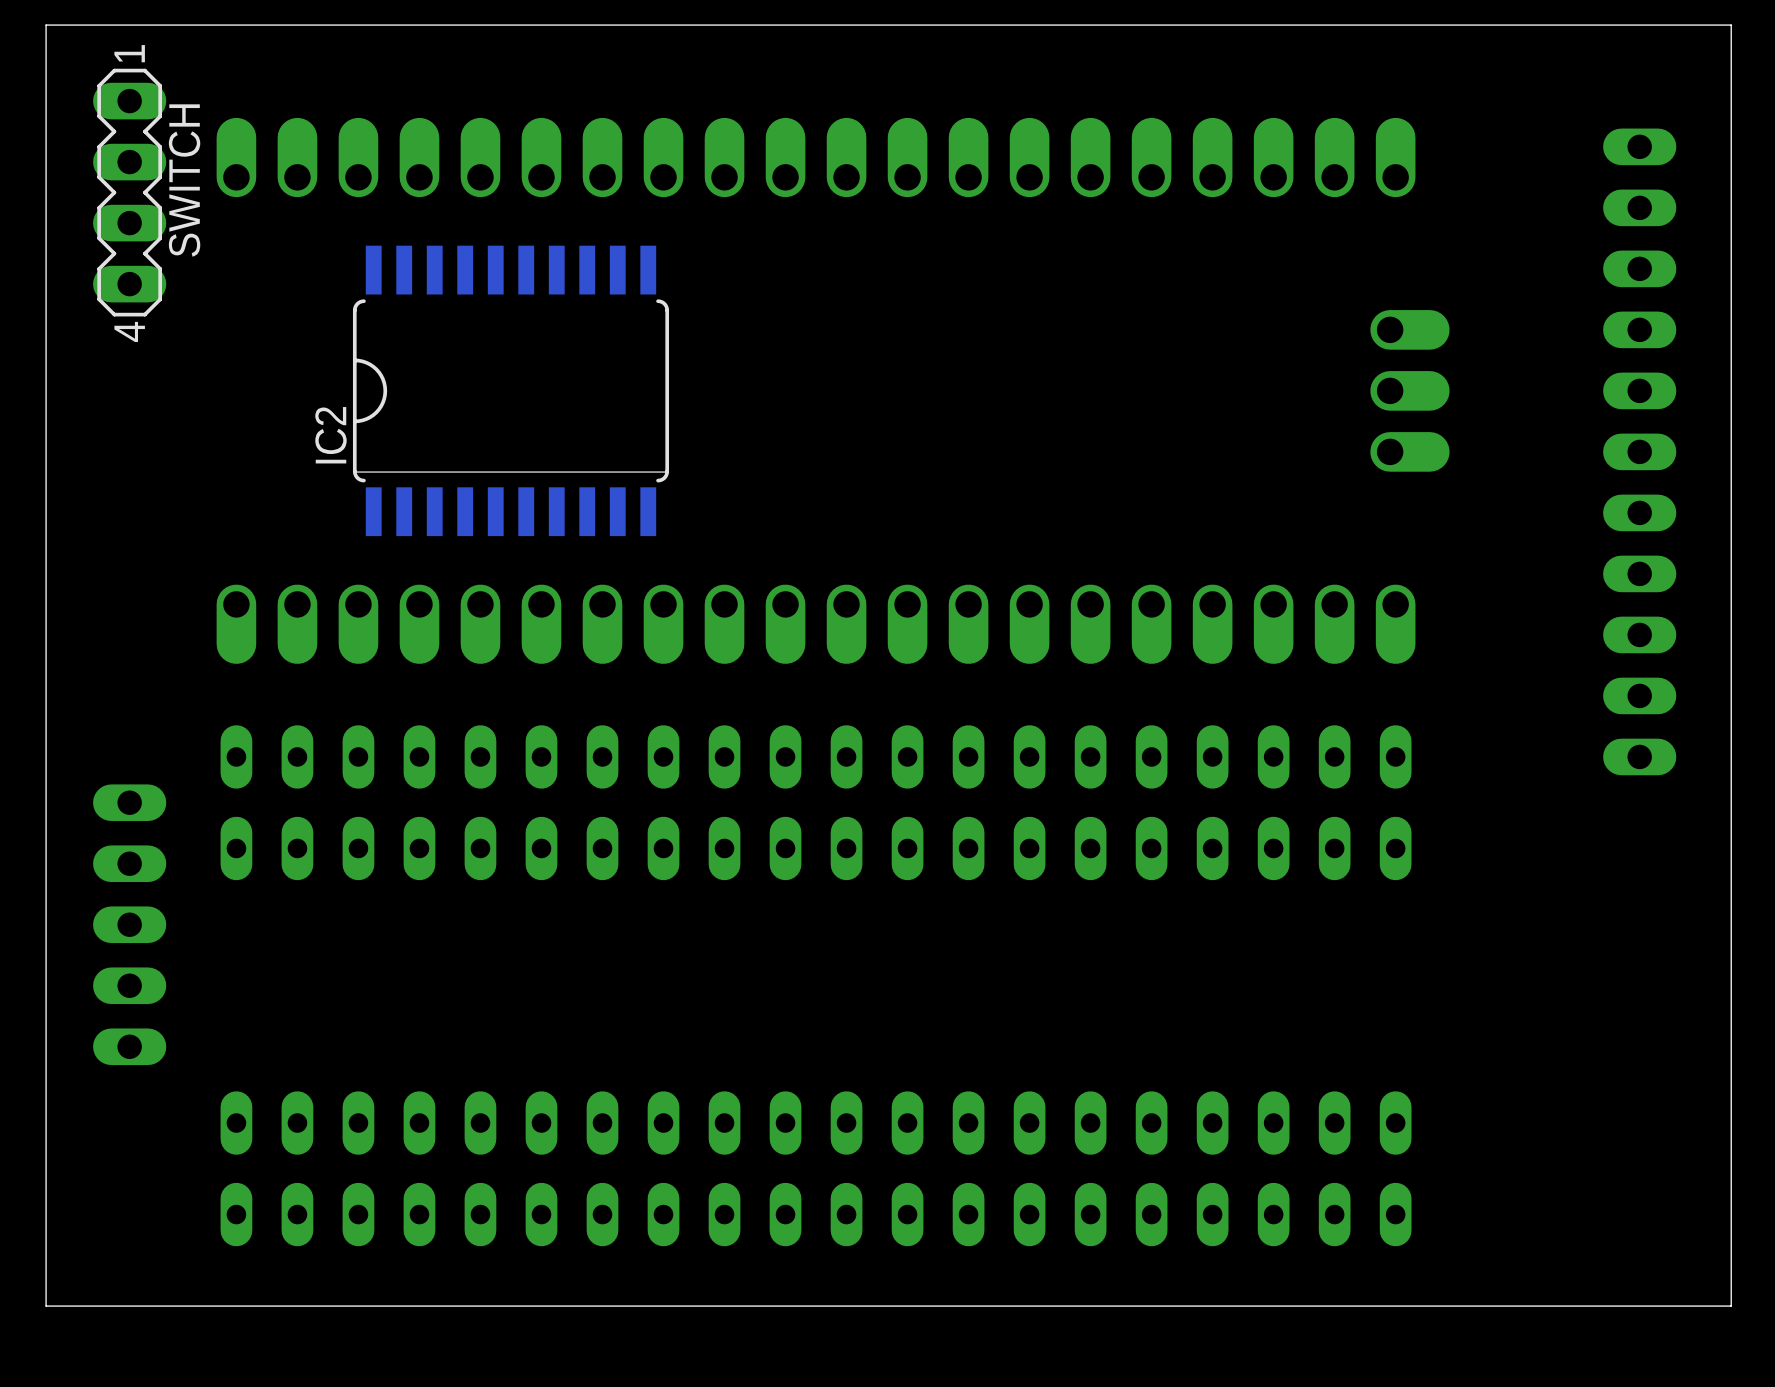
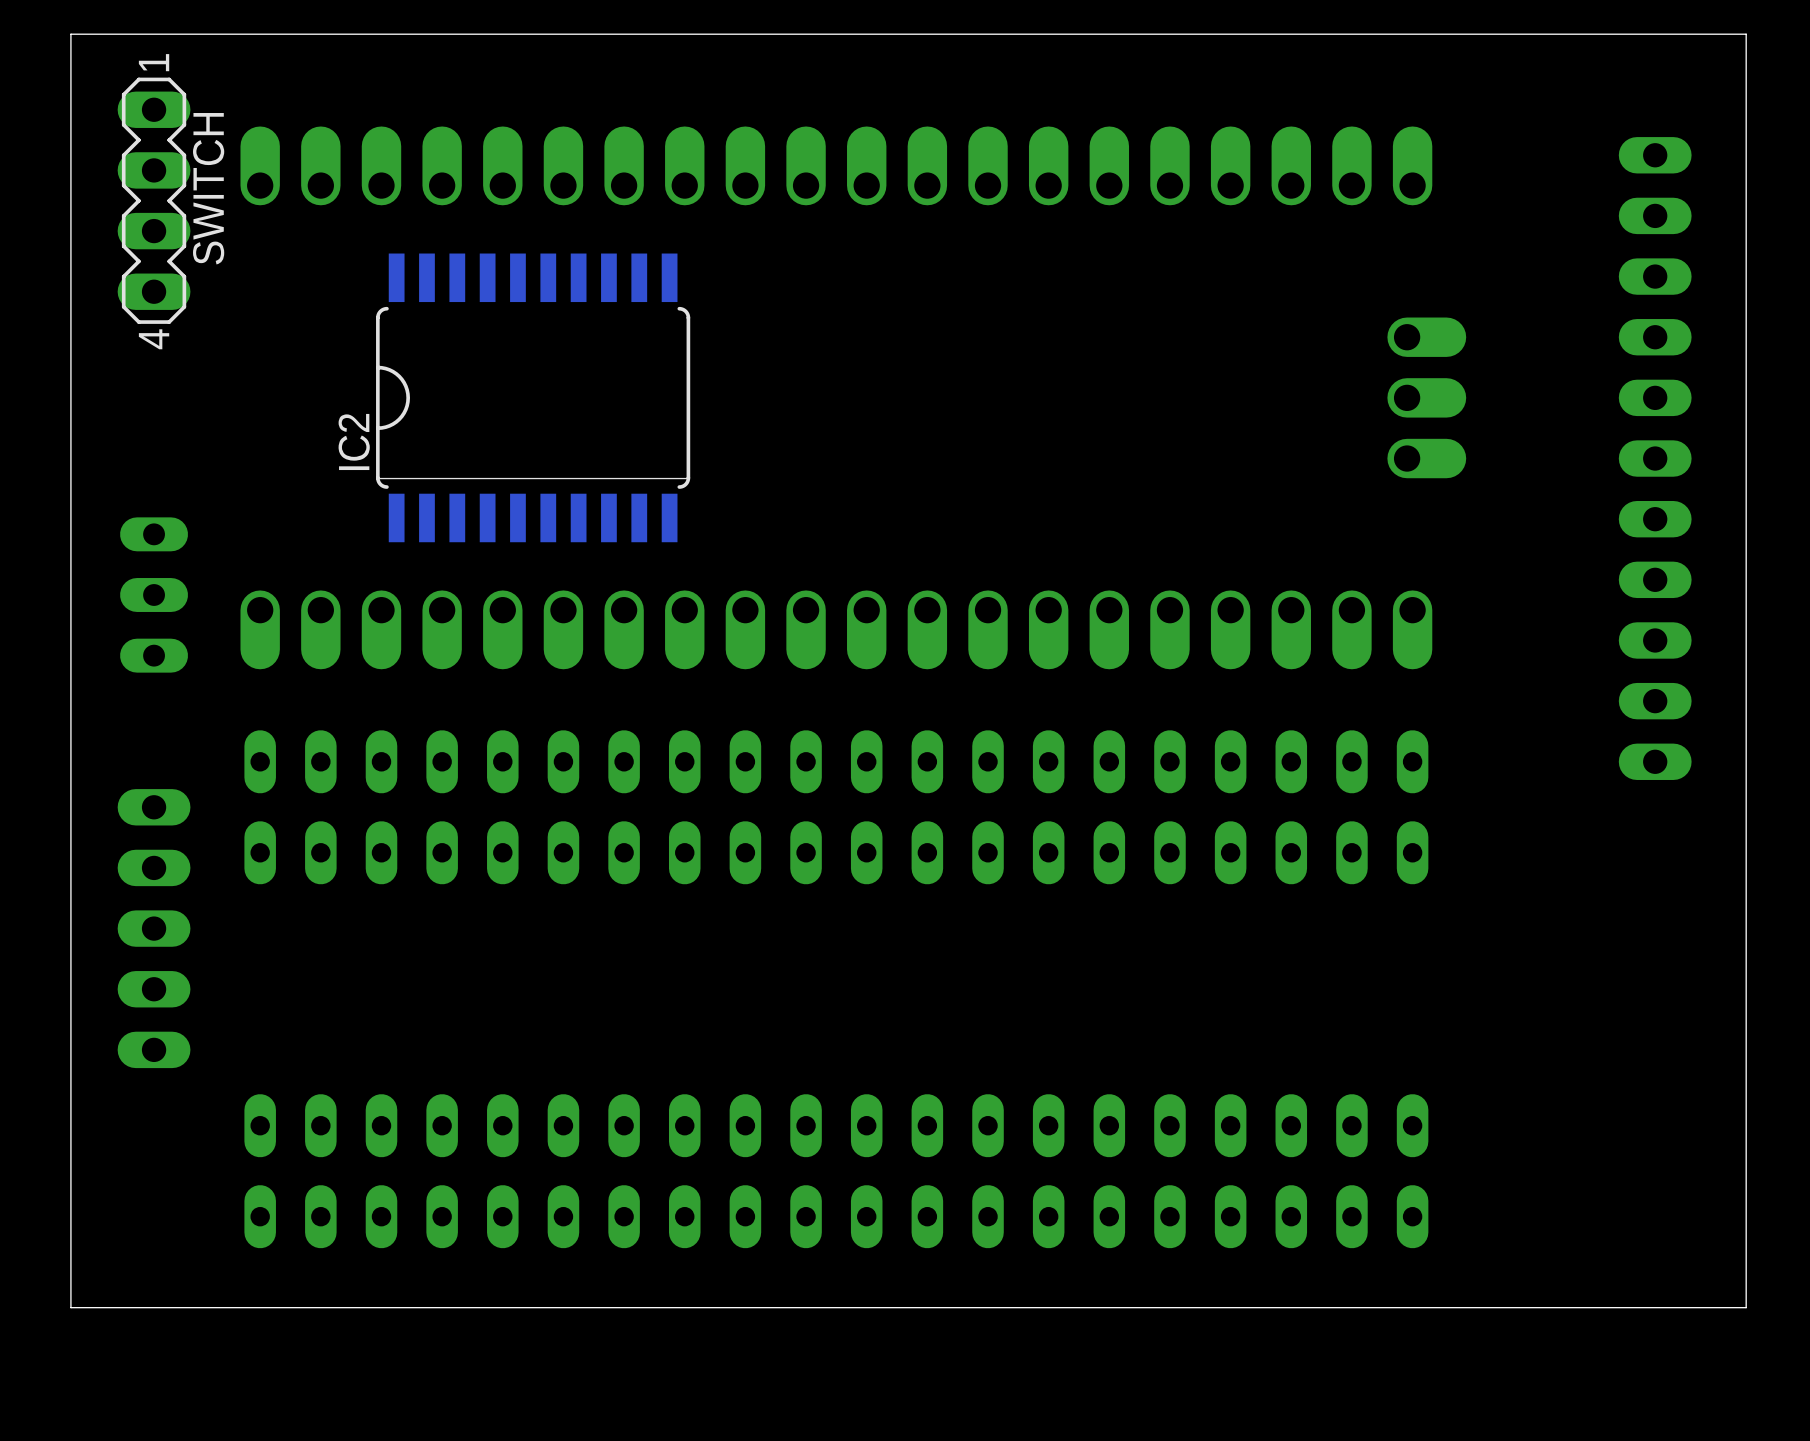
part: none -> (154, 594)

